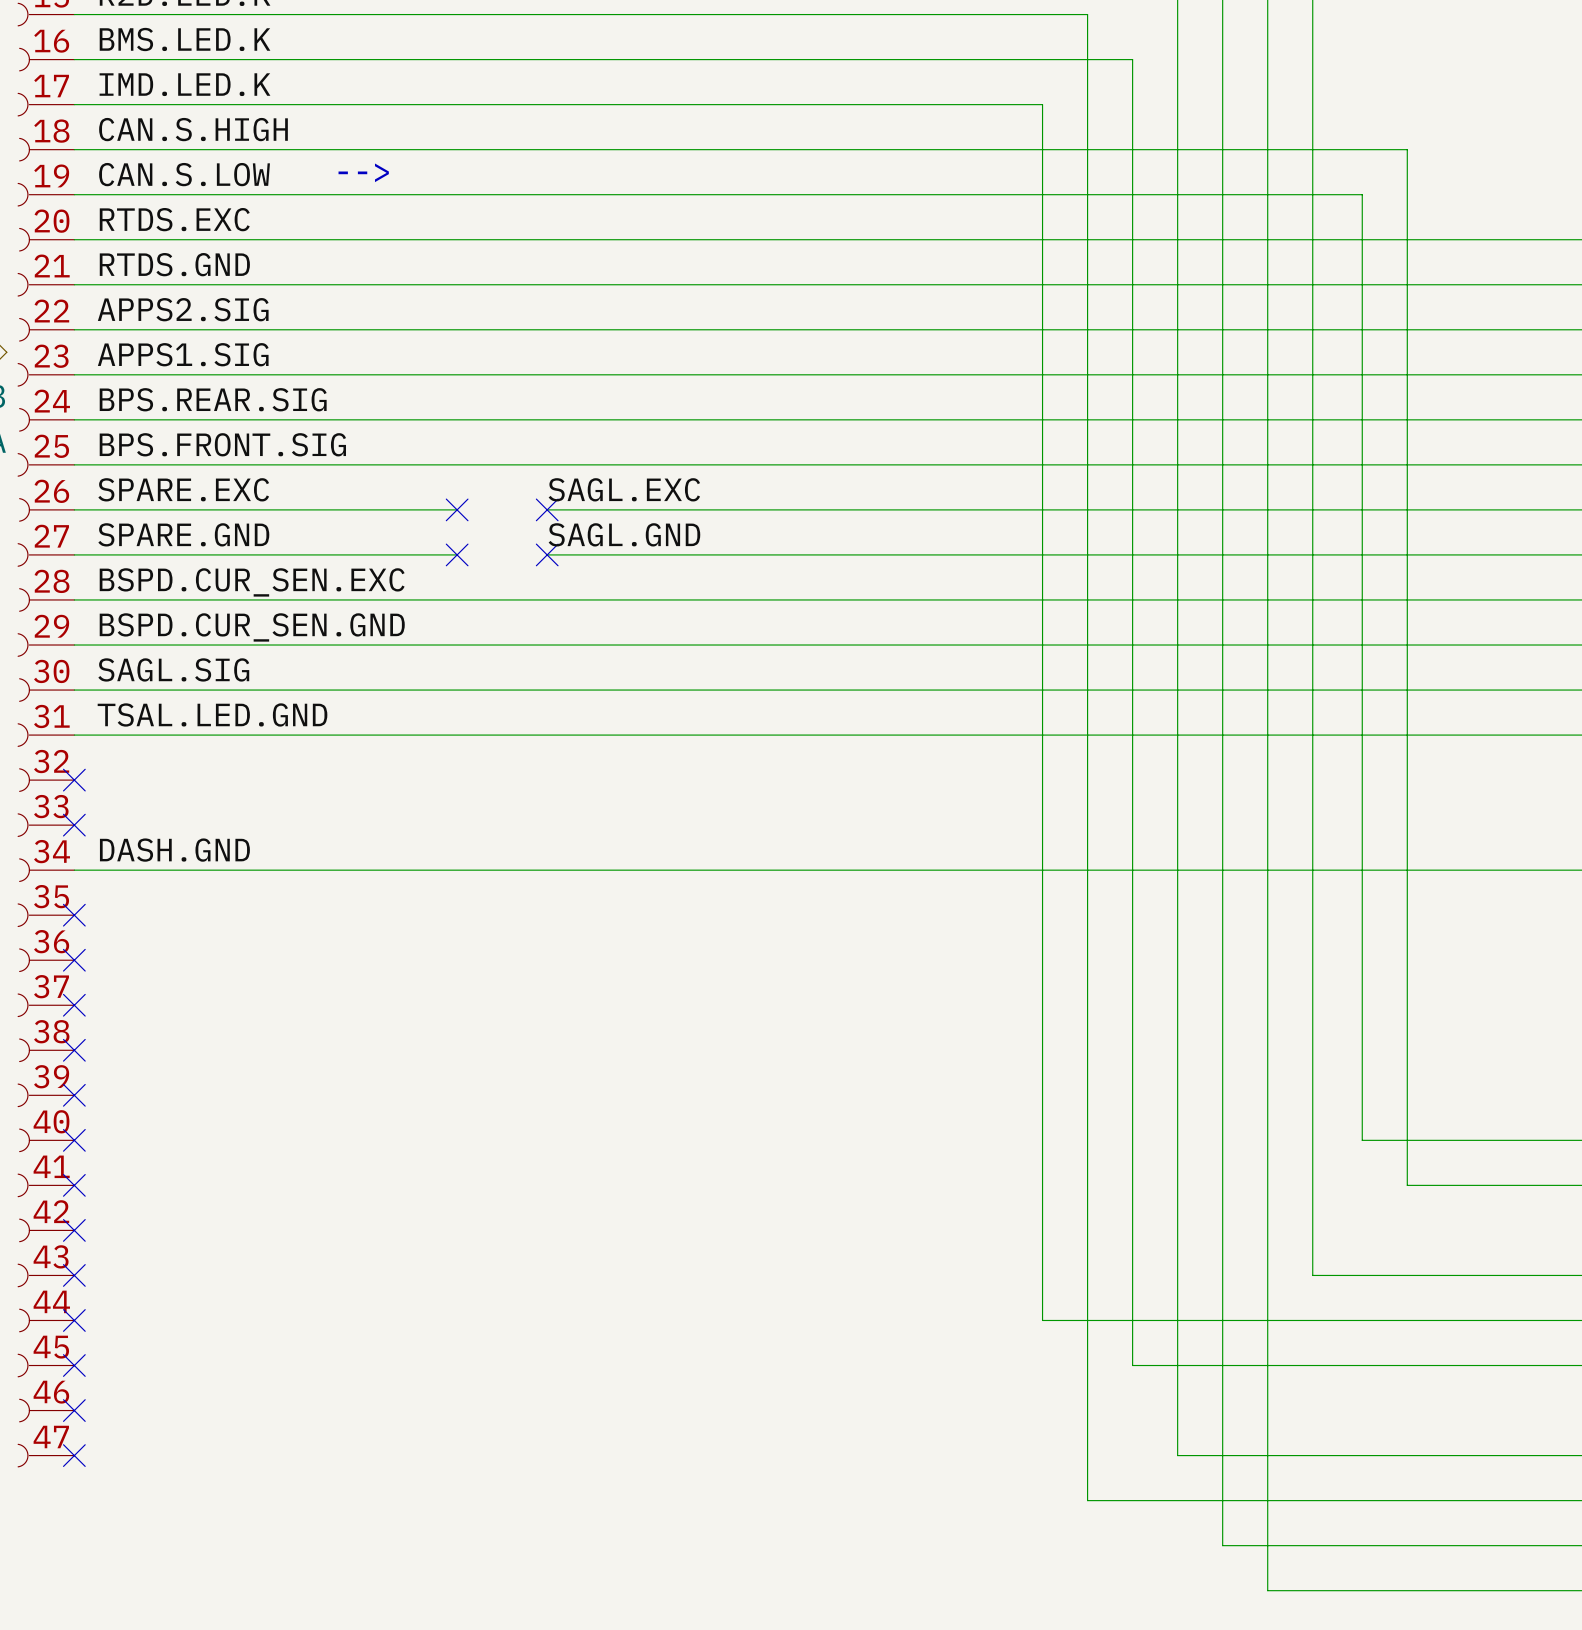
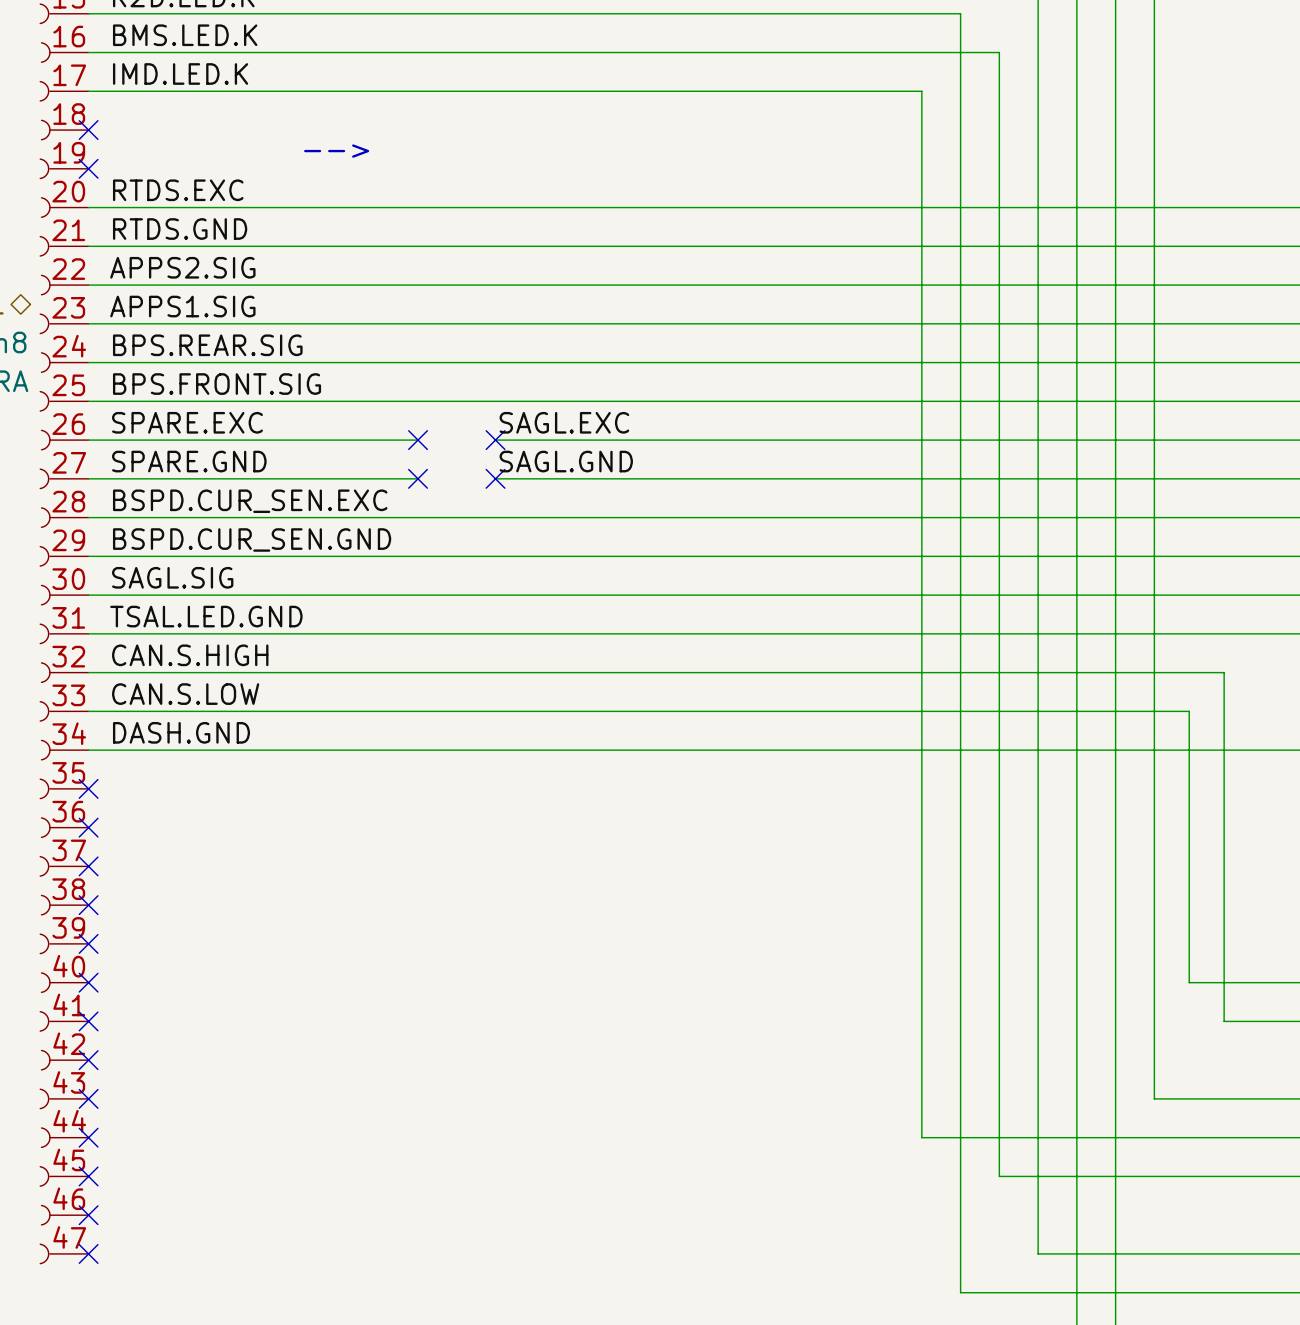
label: CAN.S.HIGH (193, 129) -> none
wire: (74, 149) (1407, 149) (1407, 1185) -> (88, 672) (1224, 672) (1224, 1021) (1235, 1021)
no-connect mark: none -> (88, 130)
label: CAN.S.LOW (184, 174) -> none
wire: (74, 194) (1362, 194) (1362, 1140) -> (88, 711) (1189, 711) (1189, 982) (1197, 982)
no-connect mark: none -> (88, 168)
label: none -> CAN.S.HIGH (190, 655)
no-connect mark: (74, 780) -> none
label: none -> CAN.S.LOW (185, 694)
no-connect mark: (74, 825) -> none

